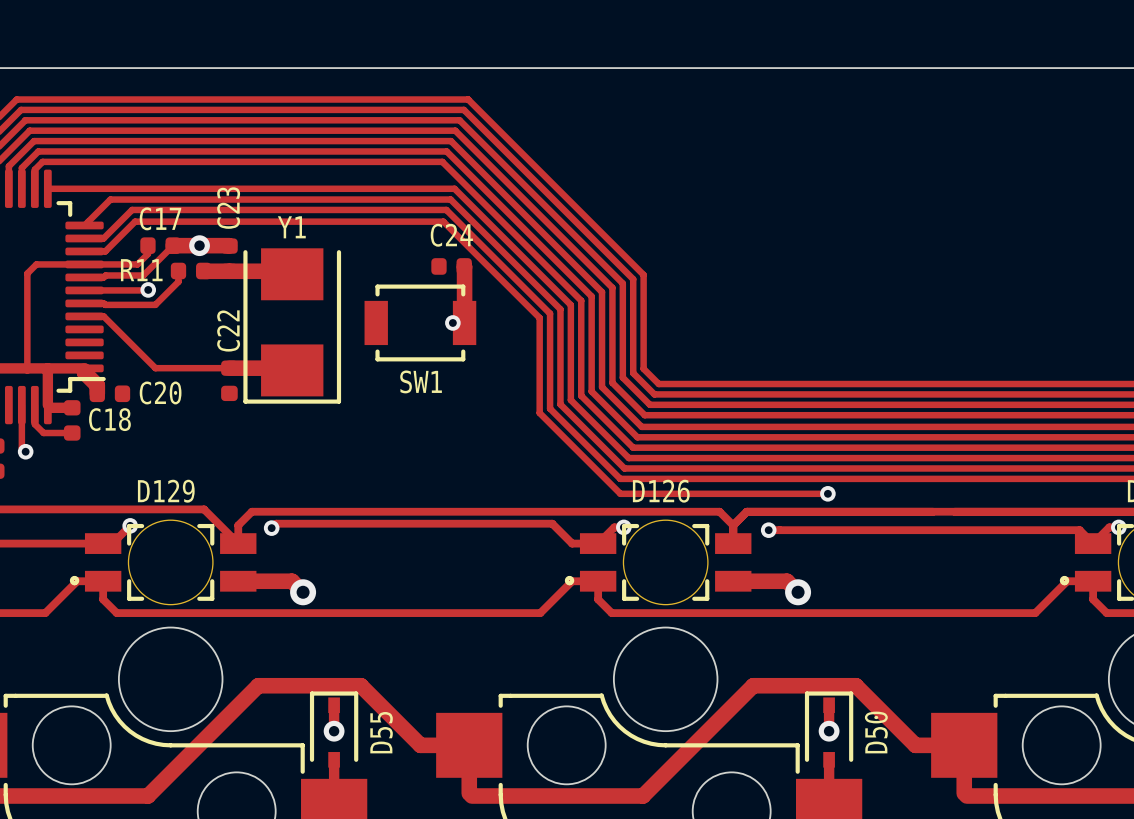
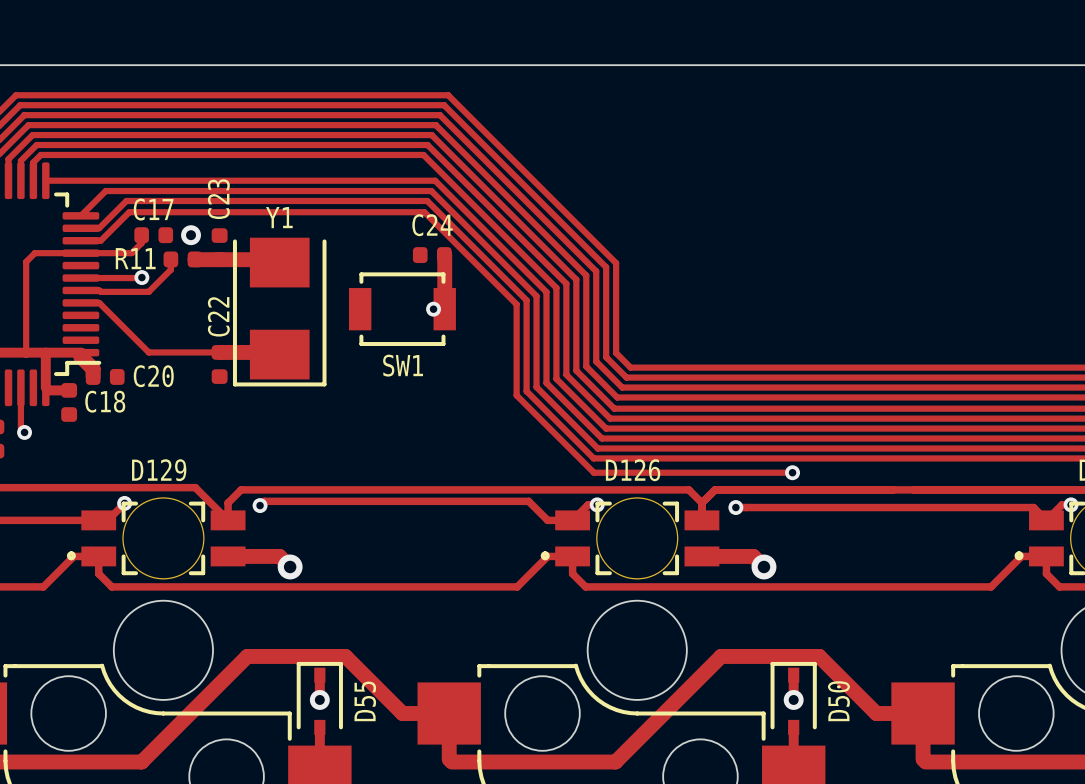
track: (229, 246) (173, 245) (143, 275) (84, 277) -> none
track: (34, 405) (34, 424) (43, 433) (72, 433) -> none

